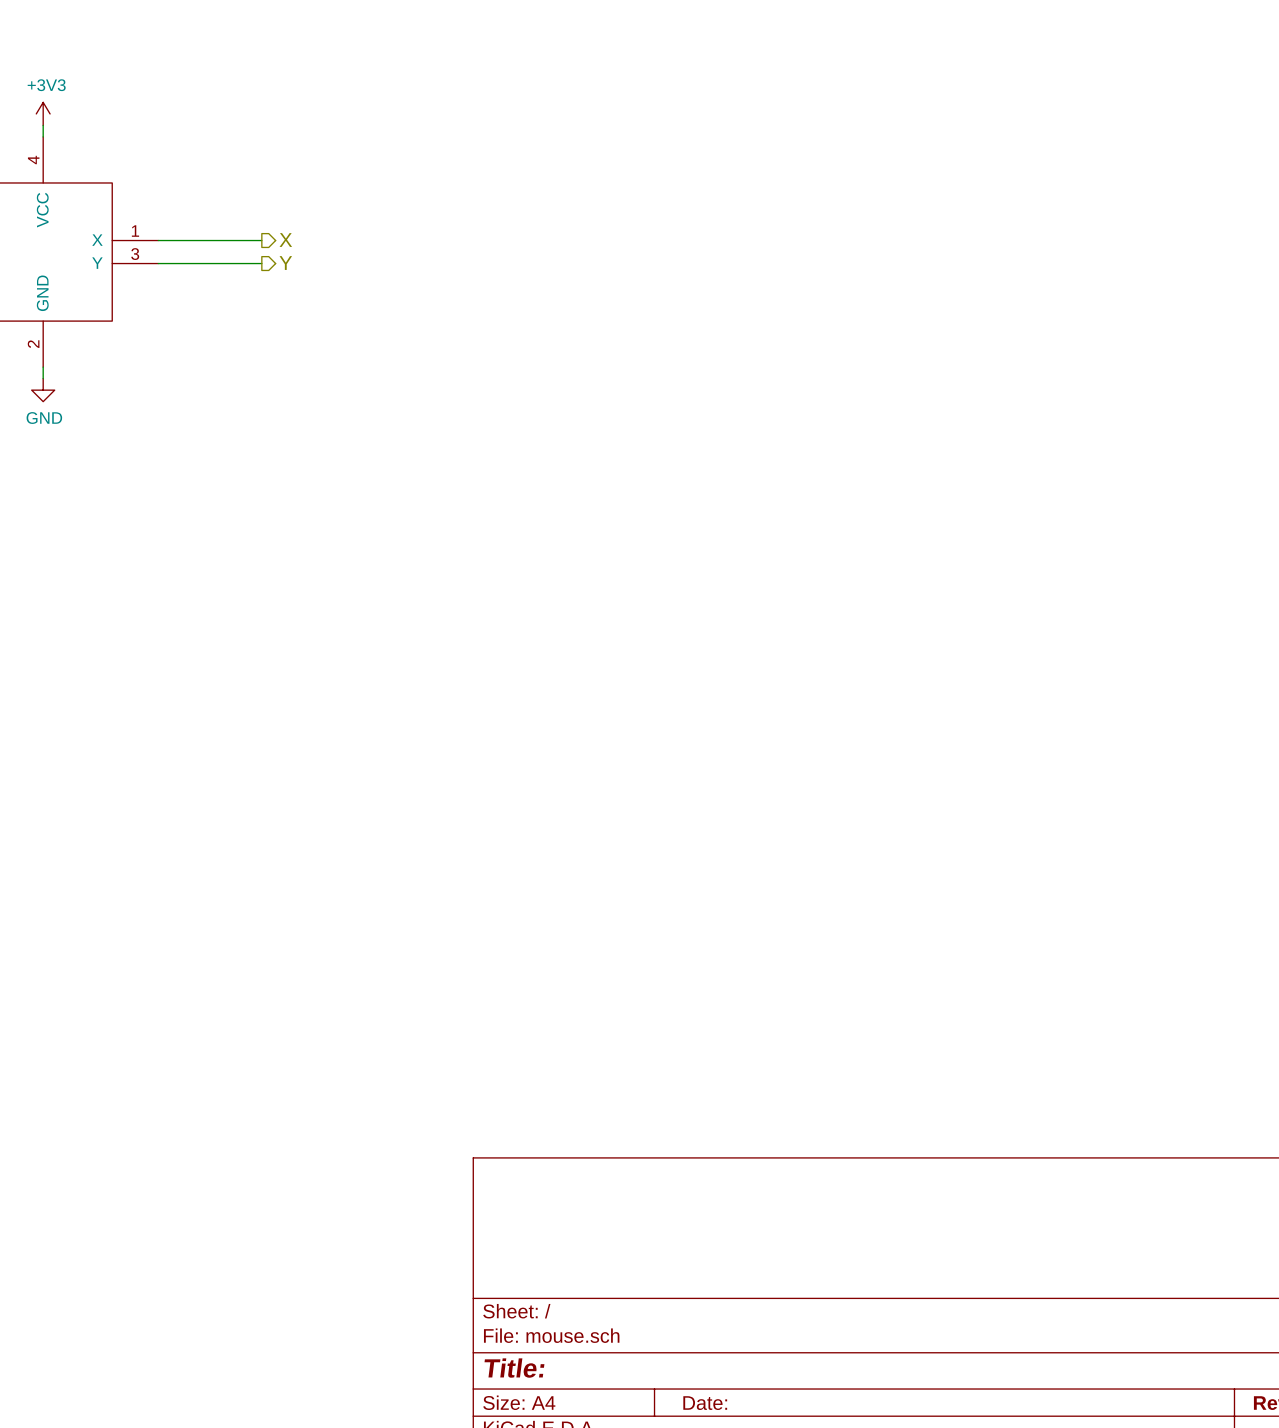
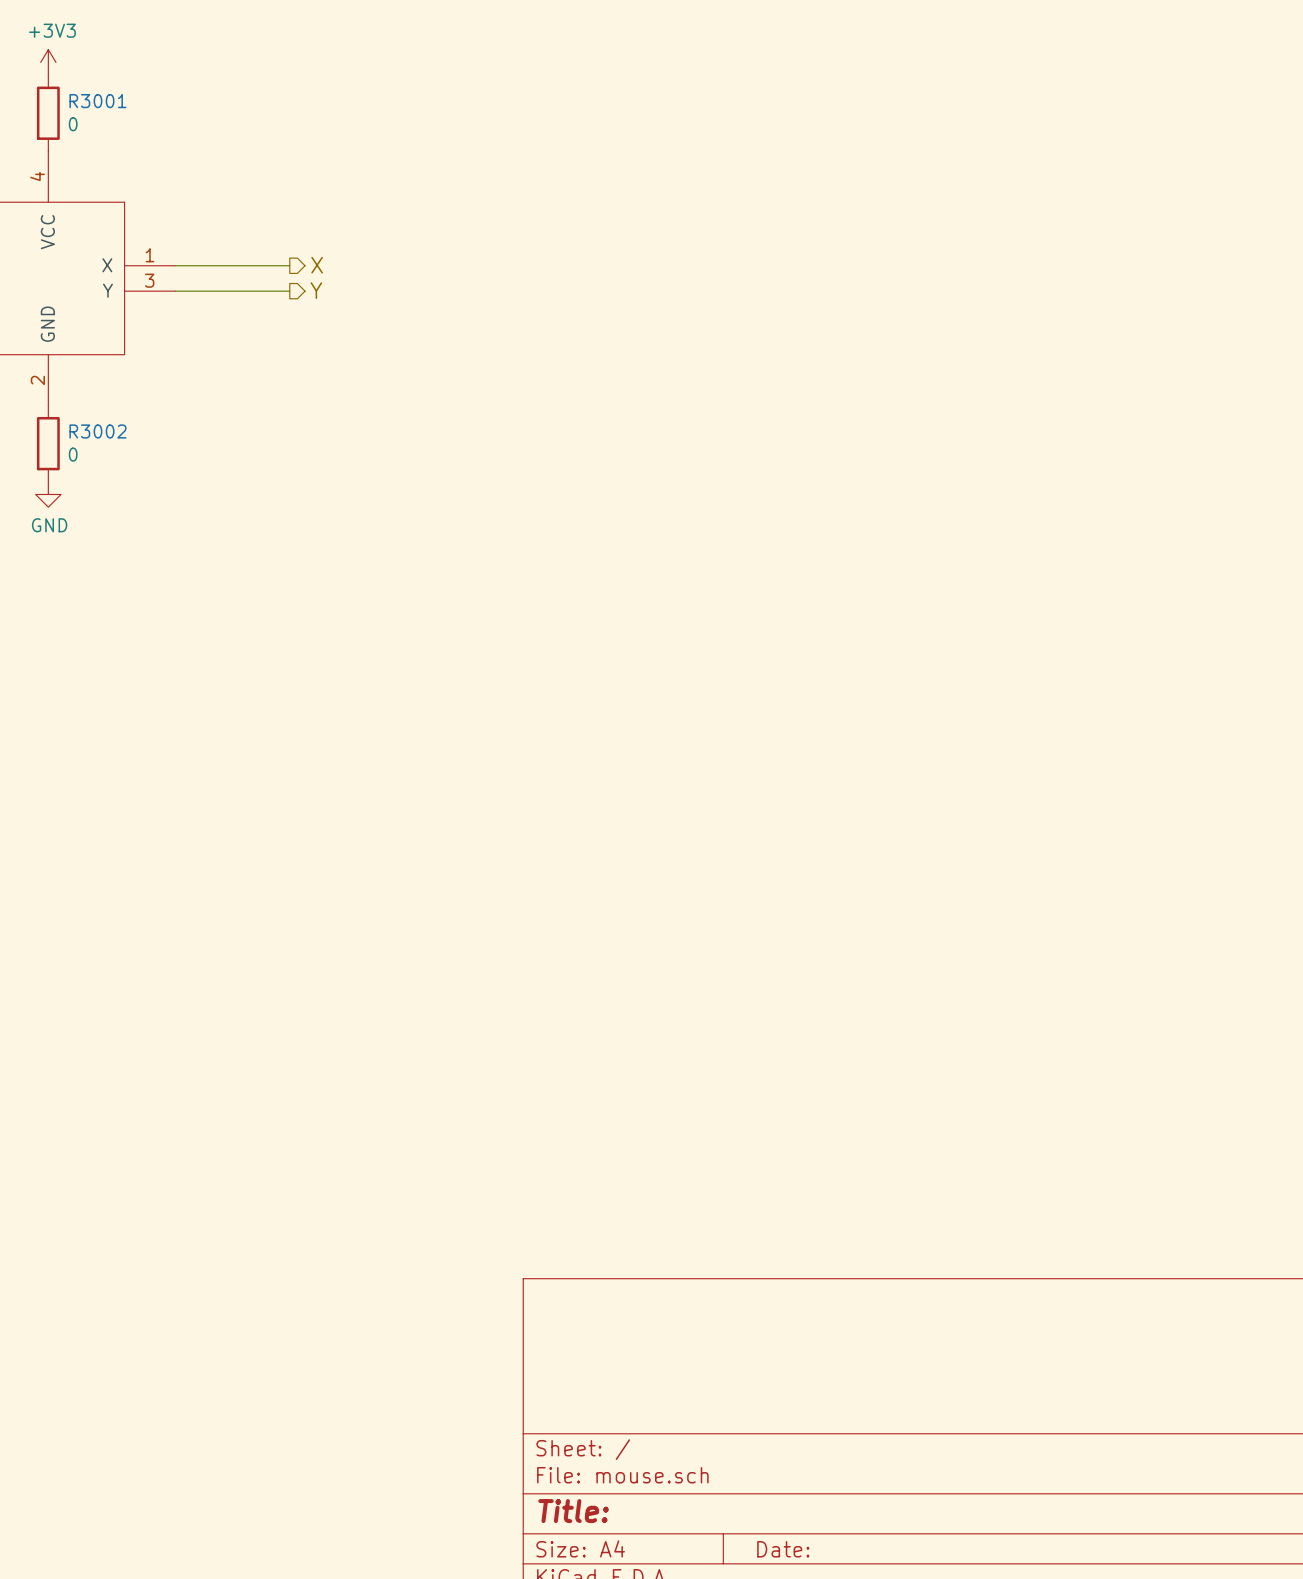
R3001: none -> 0 (48, 113)
power symbol position: +3V3 (43, 113) -> +3V3 (48, 62)
power symbol position: GND (43, 390) -> GND (48, 494)
R3002: none -> 0 (48, 443)

